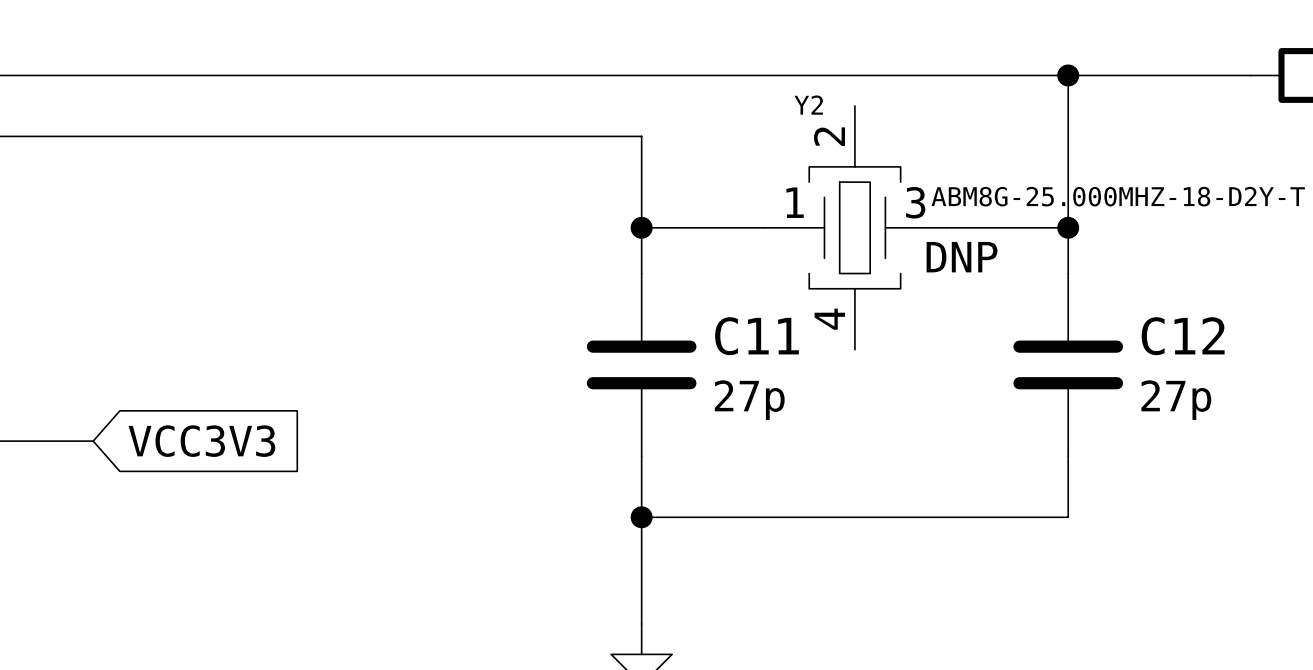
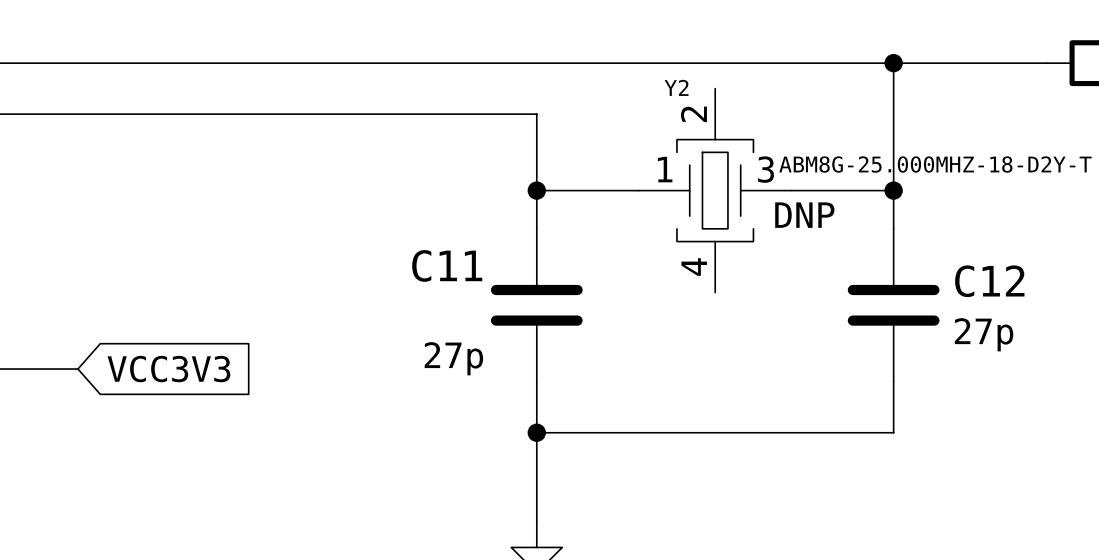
C11 name position: C11 (757, 336) -> C11 (447, 265)
C11 text position: 27p (749, 400) -> 27p (453, 358)

